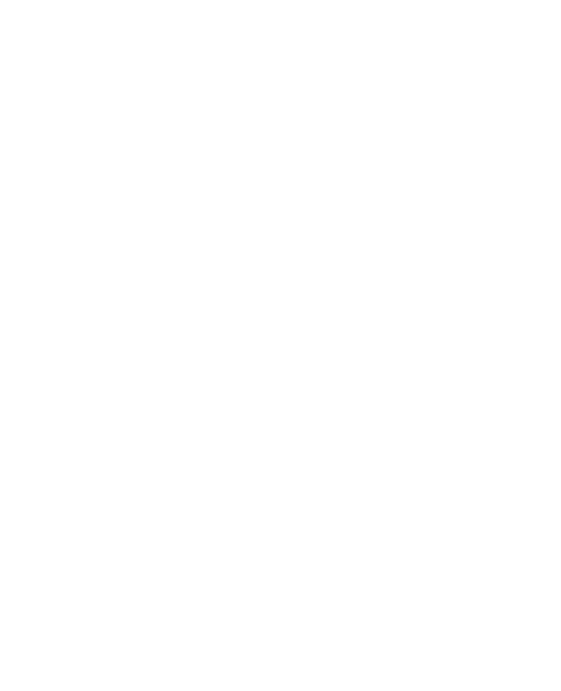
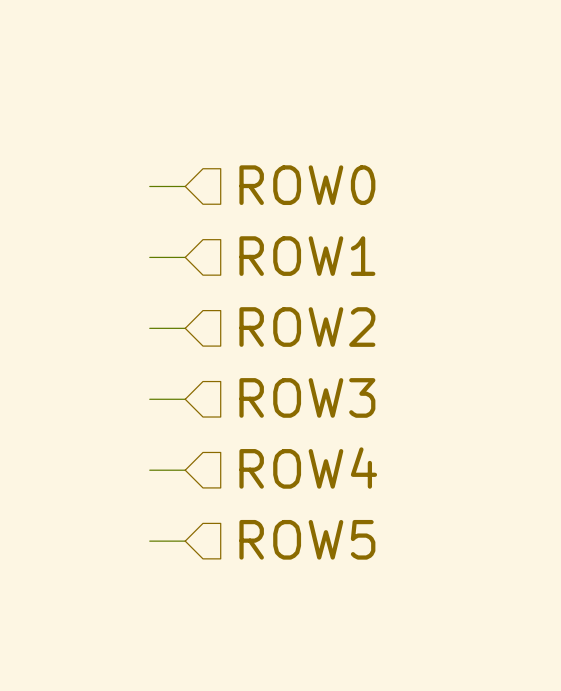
hierarchical label: none -> ROW0 (307, 185)
wire: none -> (149, 186) (185, 186)
hierarchical label: none -> ROW1 (307, 256)
wire: none -> (149, 257) (185, 257)
hierarchical label: none -> ROW2 (307, 327)
wire: none -> (149, 328) (185, 328)
hierarchical label: none -> ROW3 (307, 397)
wire: none -> (149, 399) (185, 399)
hierarchical label: none -> ROW4 (308, 468)
wire: none -> (149, 470) (185, 470)
hierarchical label: none -> ROW5 (307, 539)
wire: none -> (149, 541) (185, 541)

